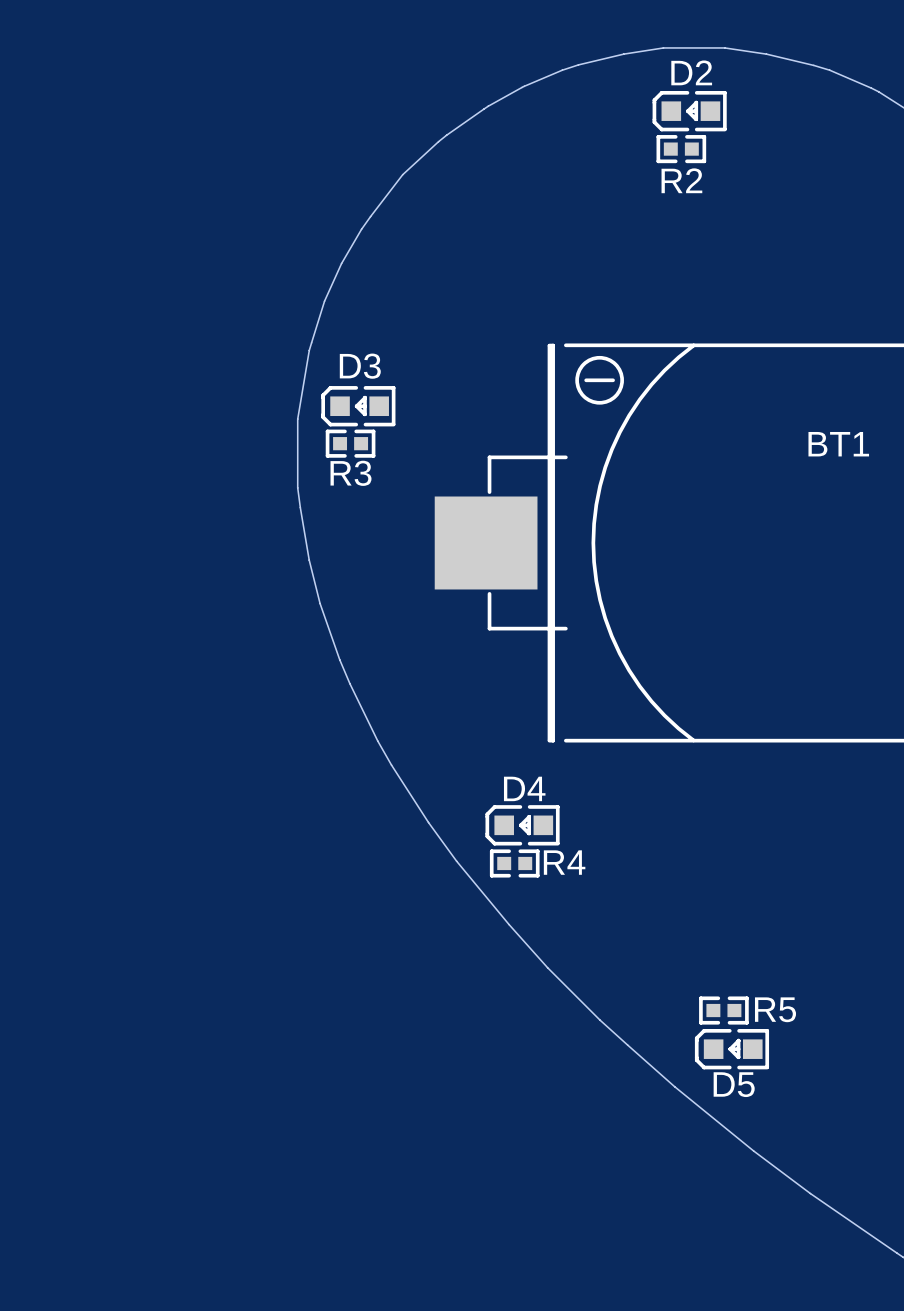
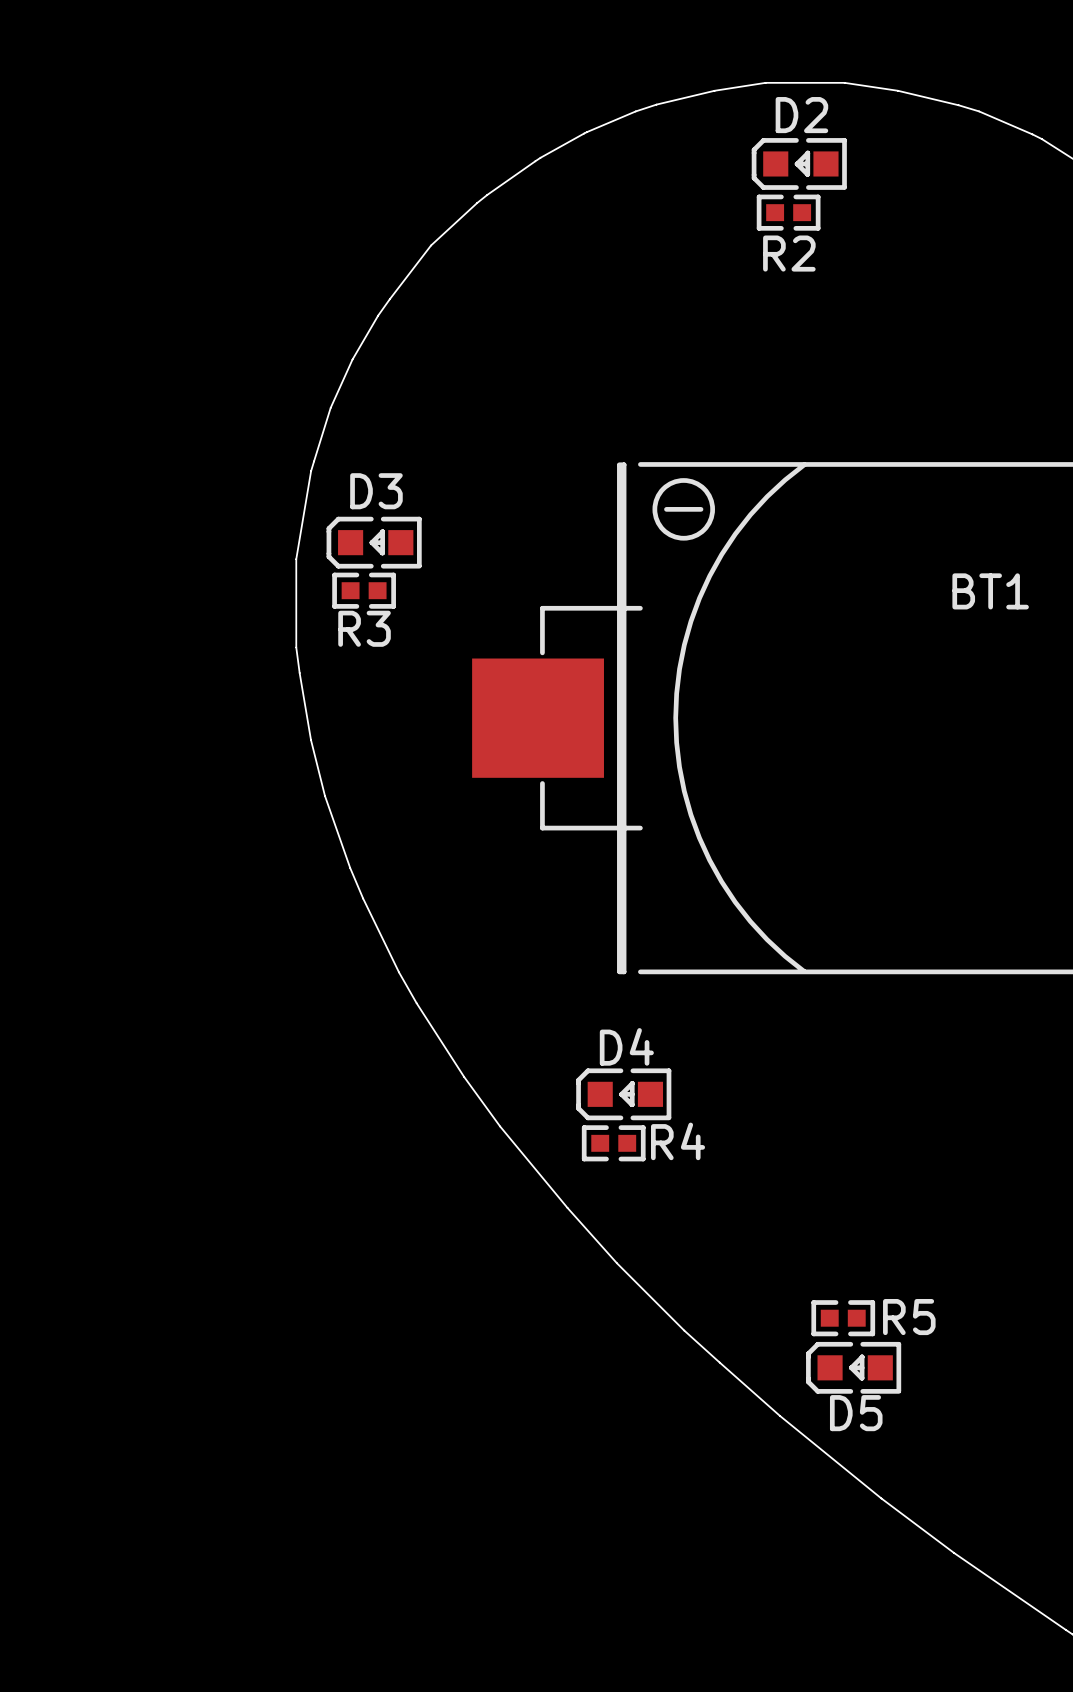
D4 position: (522, 825) -> (623, 1094)
R4 position: (514, 863) -> (613, 1143)

